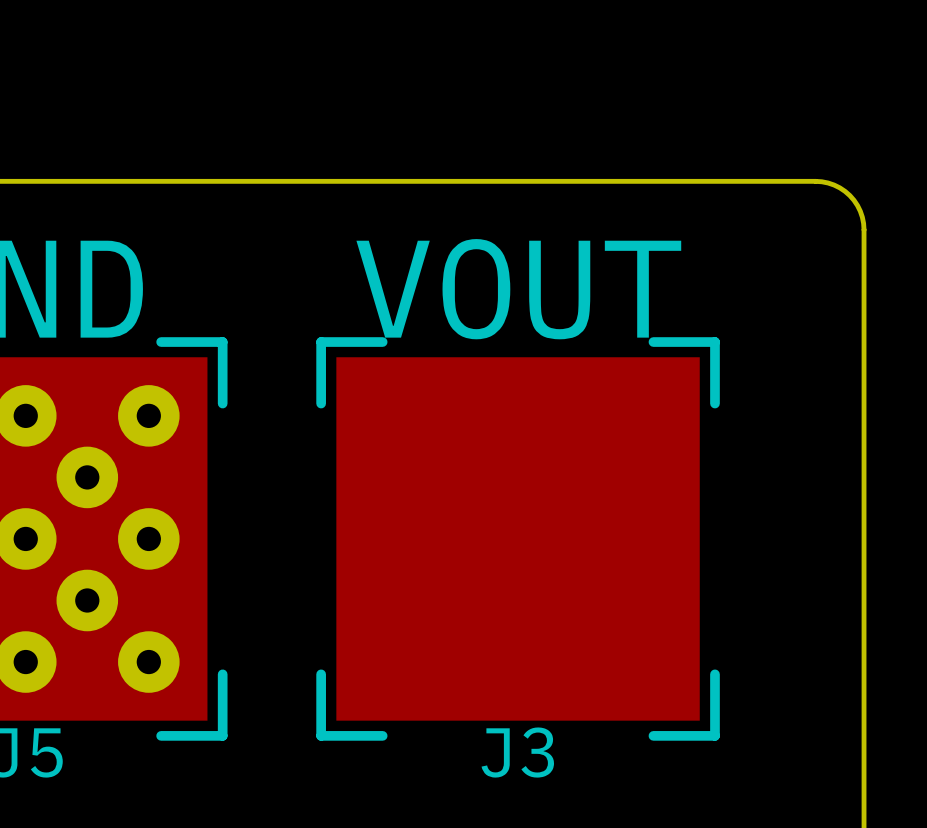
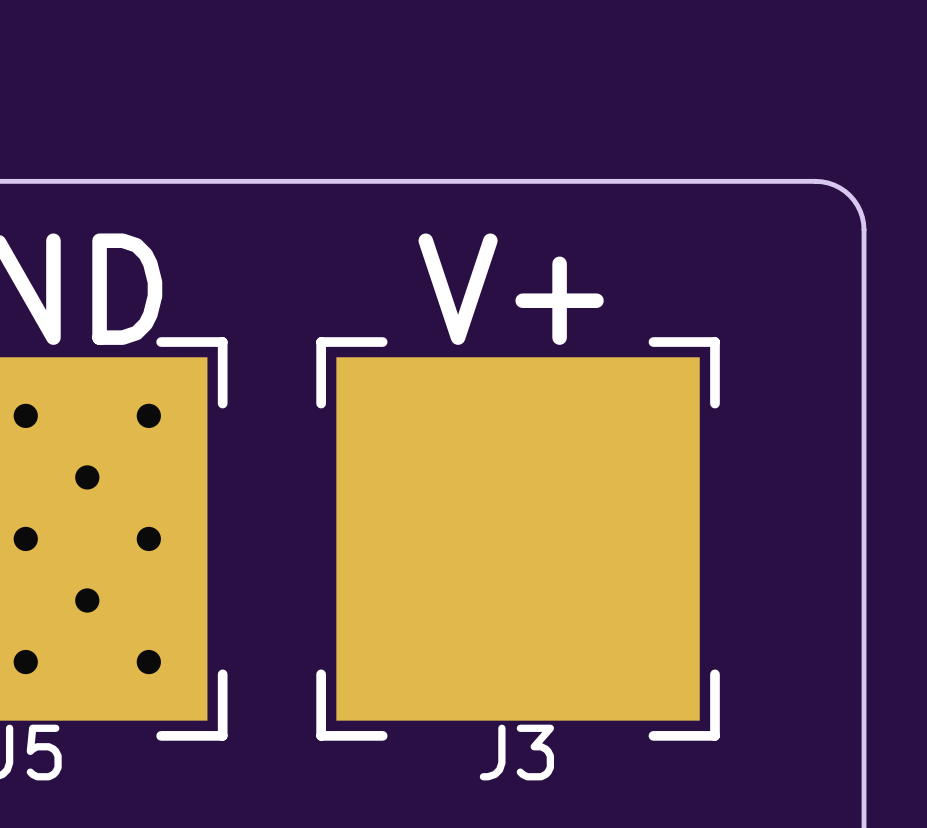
J3 text: VOUT (518, 289) -> V+ (511, 289)

